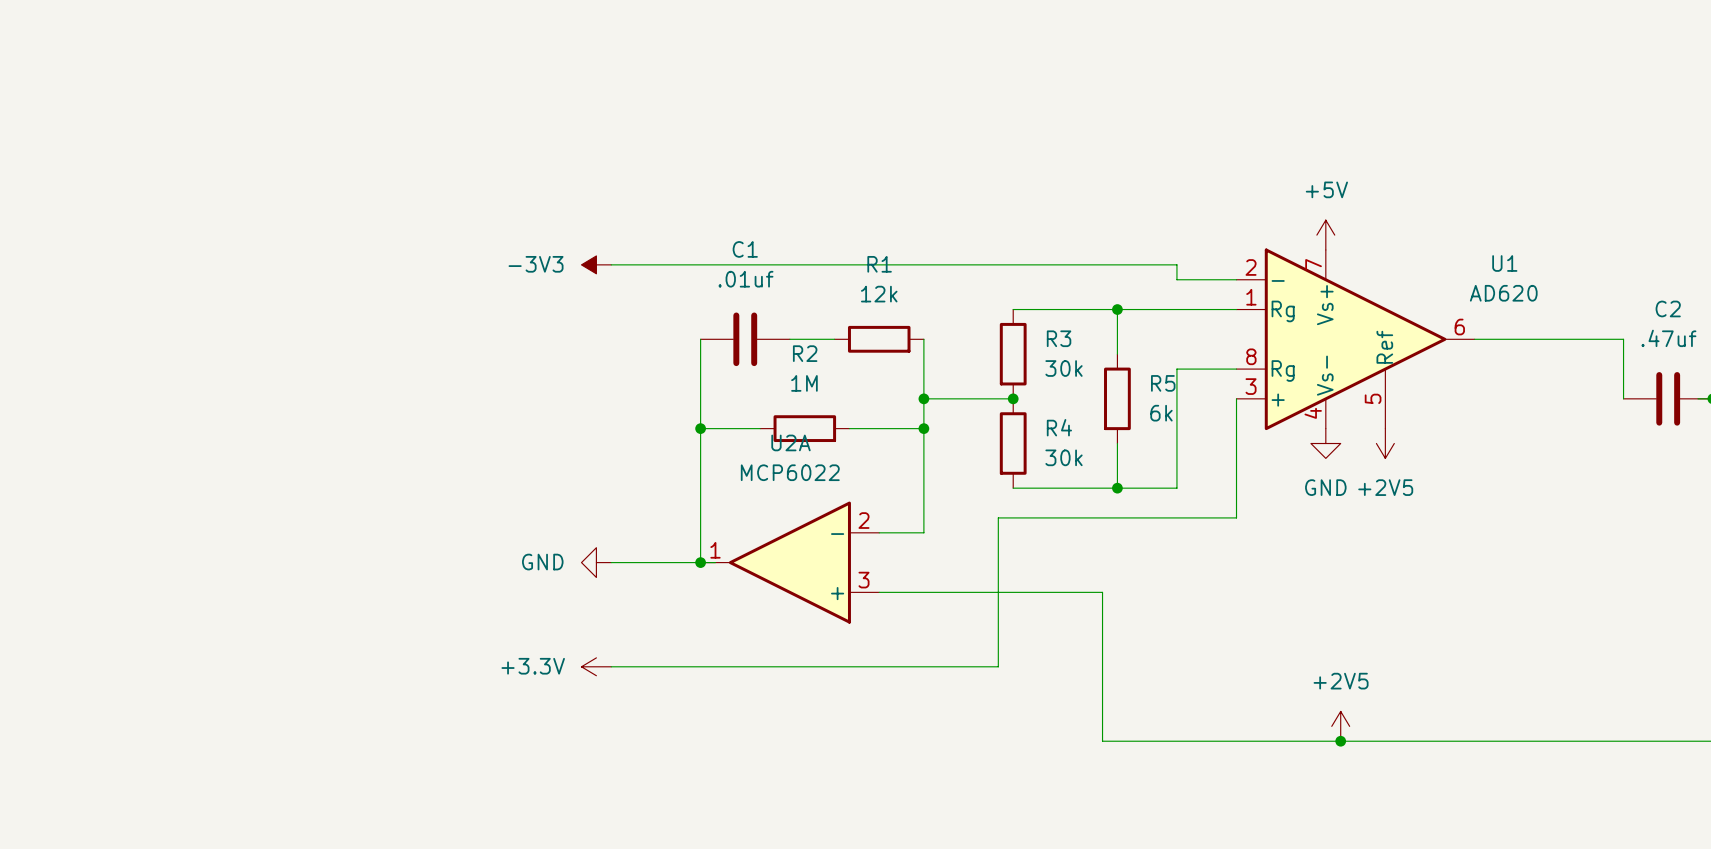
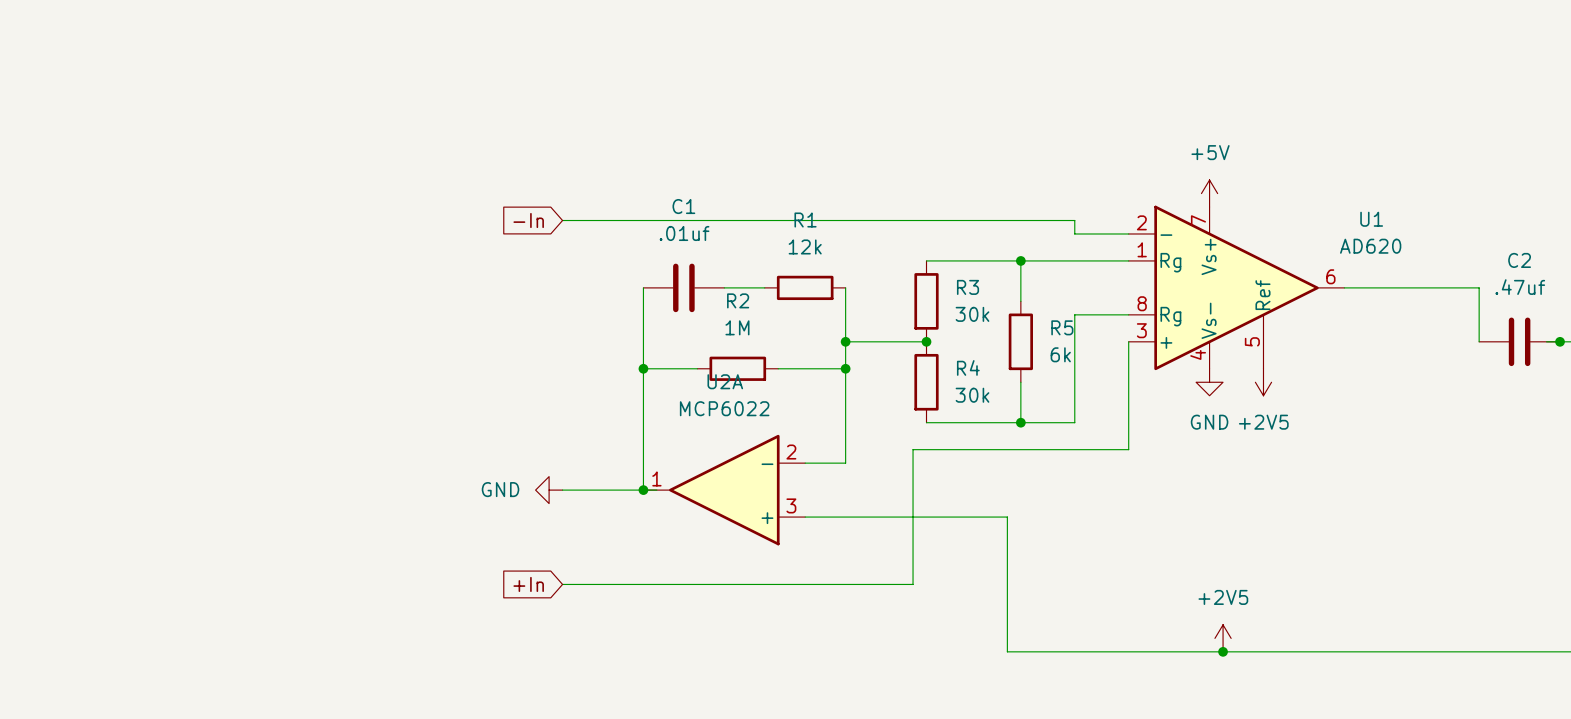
global label: none -> -In (528, 220)
power symbol: -3V3 (596, 264) -> none
global label: none -> +In (528, 584)
power symbol: +3.3V (596, 666) -> none

